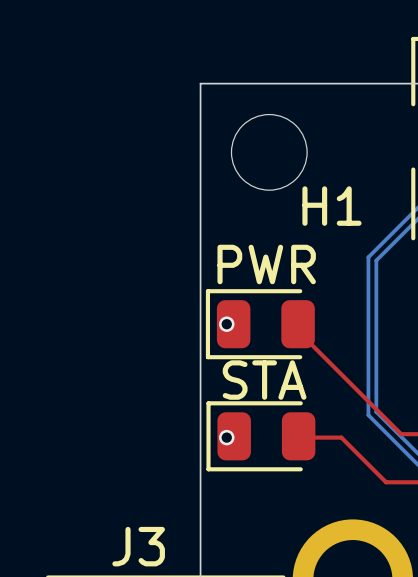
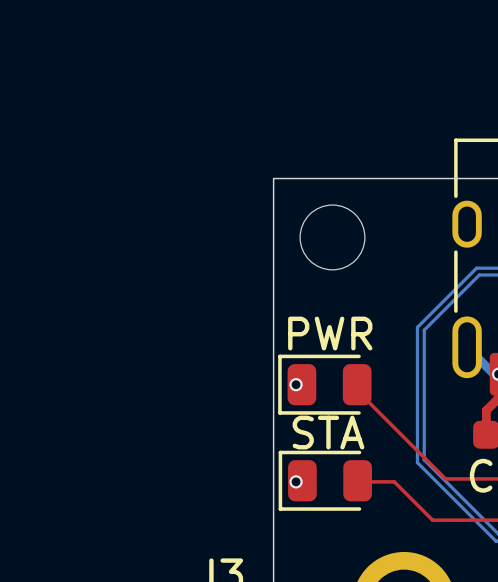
H1 name: H1 (331, 206) -> none

